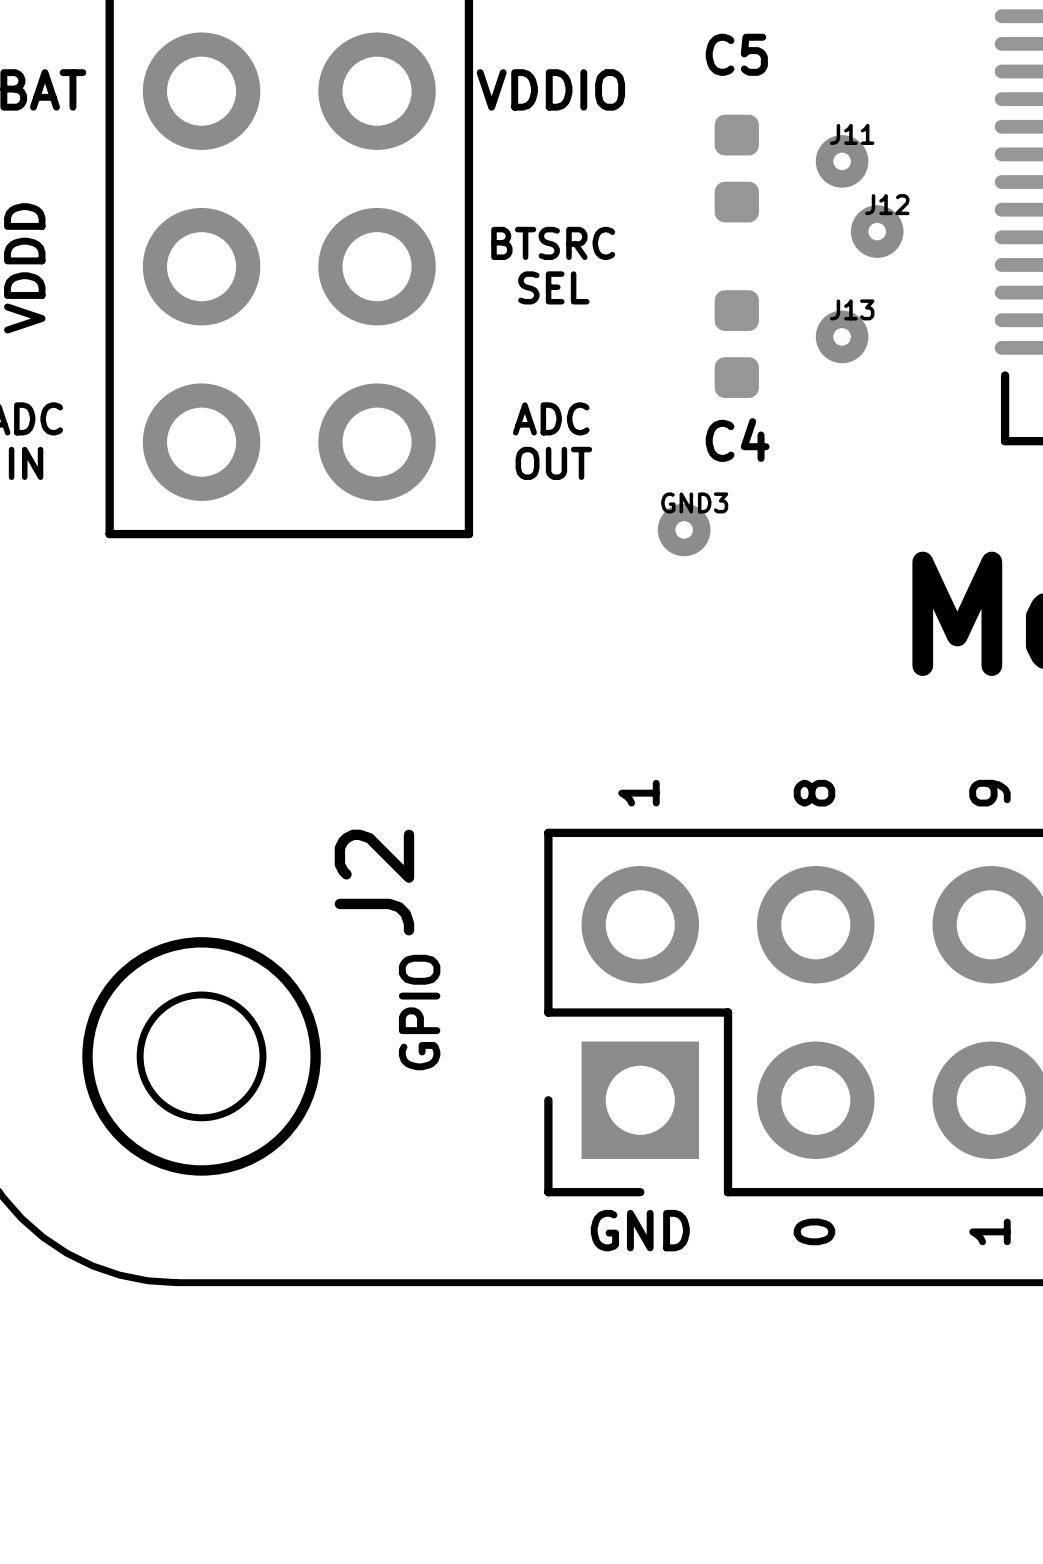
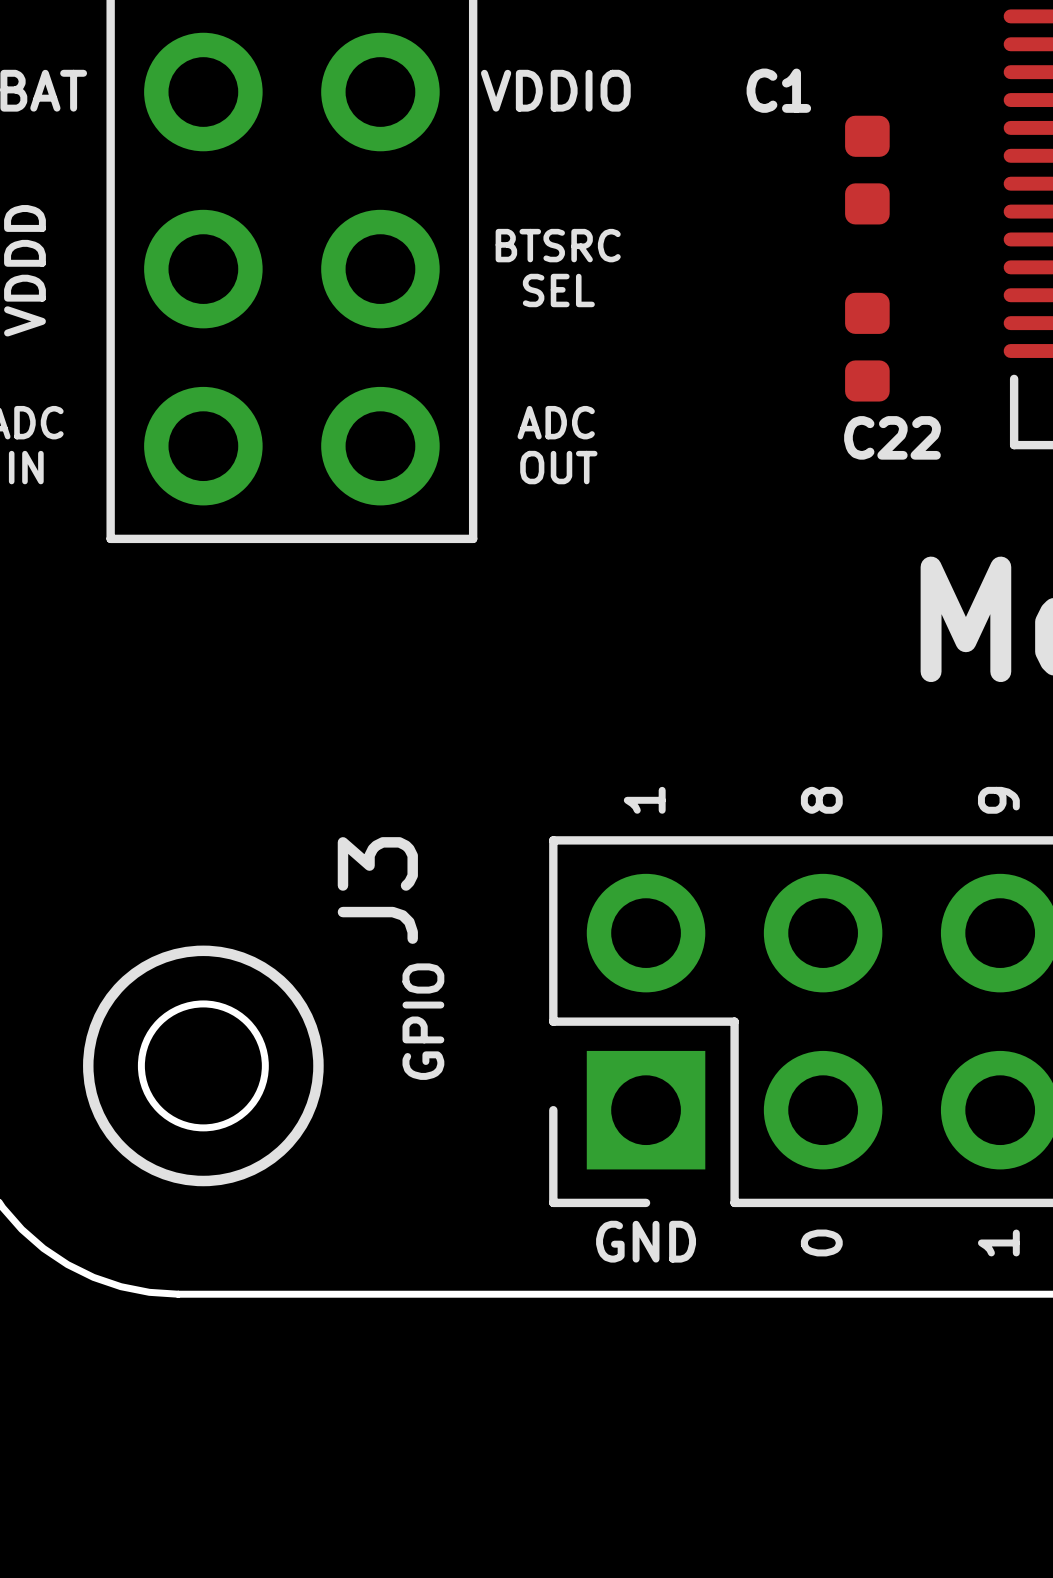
J11: (842, 161) -> none
C5: (736, 168) -> none
C1: none -> (867, 170)
J12: (877, 231) -> none
J13: (842, 336) -> none
C4: (736, 344) -> none
C22: none -> (867, 347)
GND3: (684, 529) -> none
J2 name: J2 (374, 882) -> J3 (377, 890)

